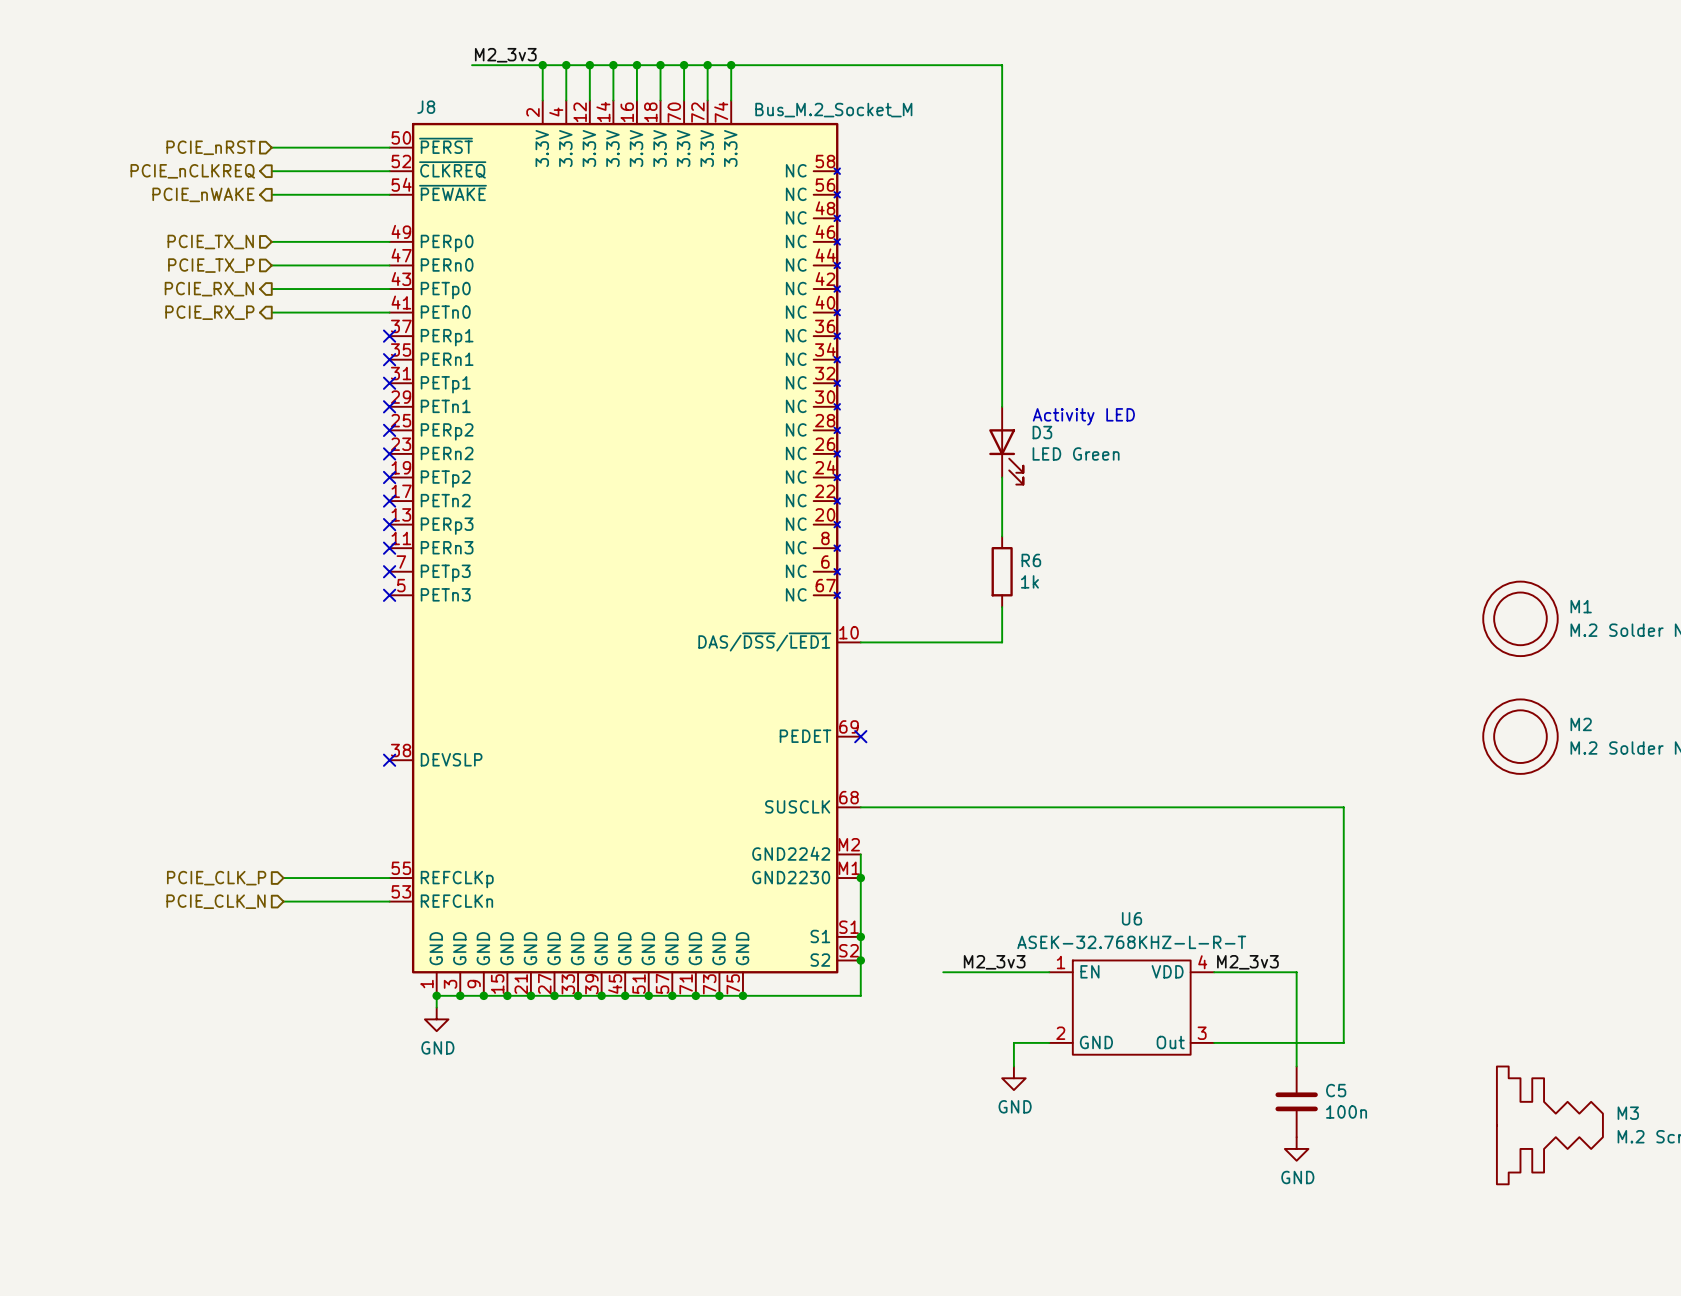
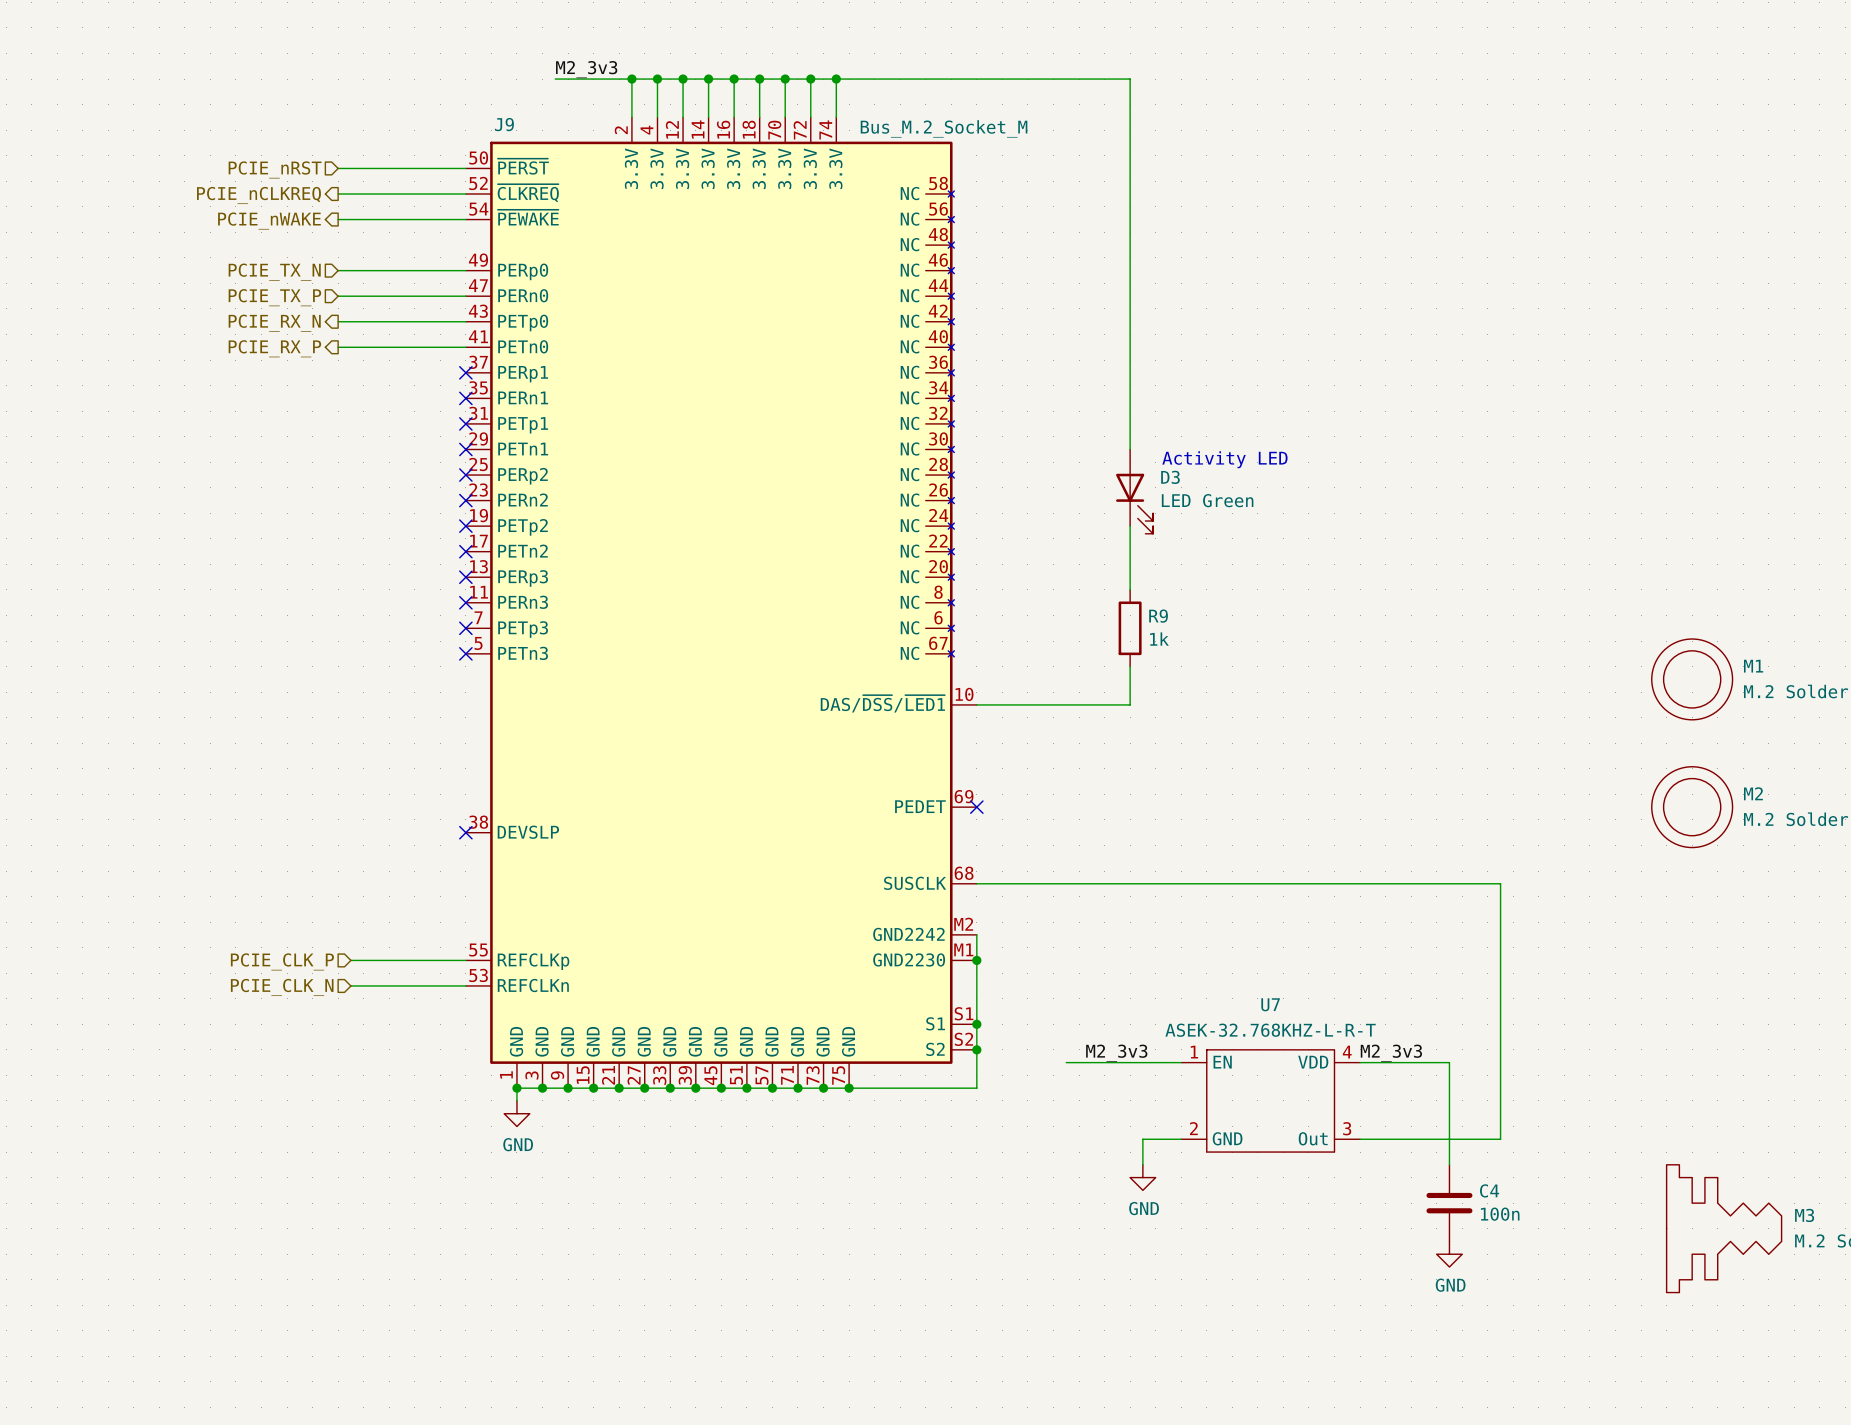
J8 name: J8 (426, 107) -> J9 (504, 124)
R6 name: R6 (1031, 560) -> R9 (1158, 616)
U6 name: U6 (1132, 918) -> U7 (1270, 1004)
C5 name: C5 (1336, 1090) -> C4 (1489, 1190)

